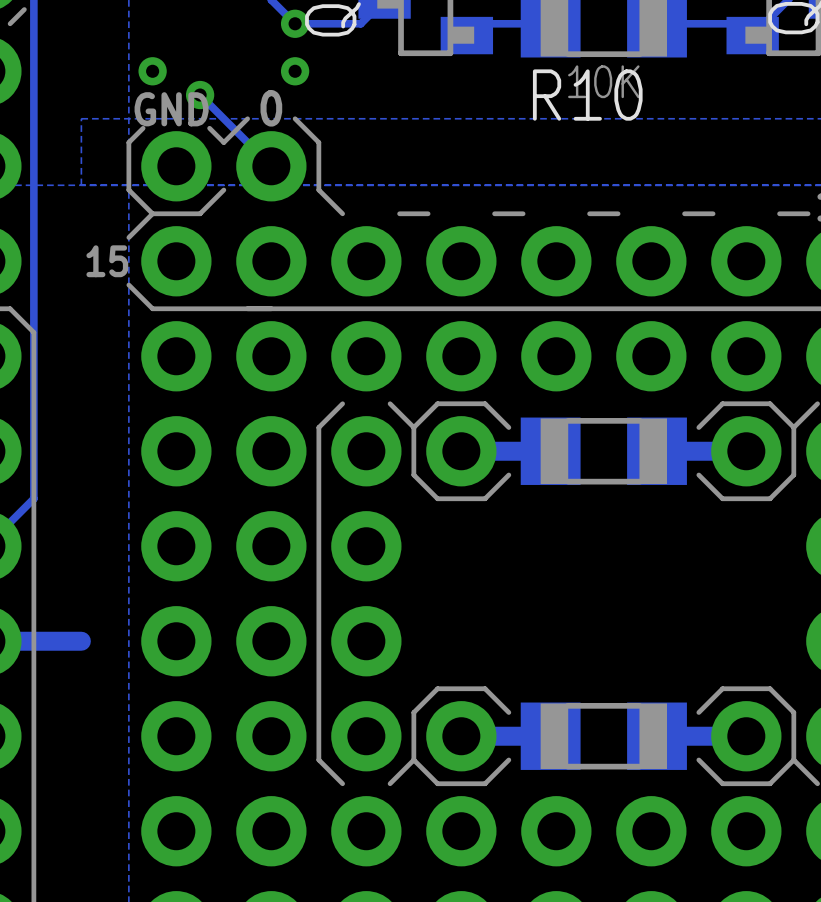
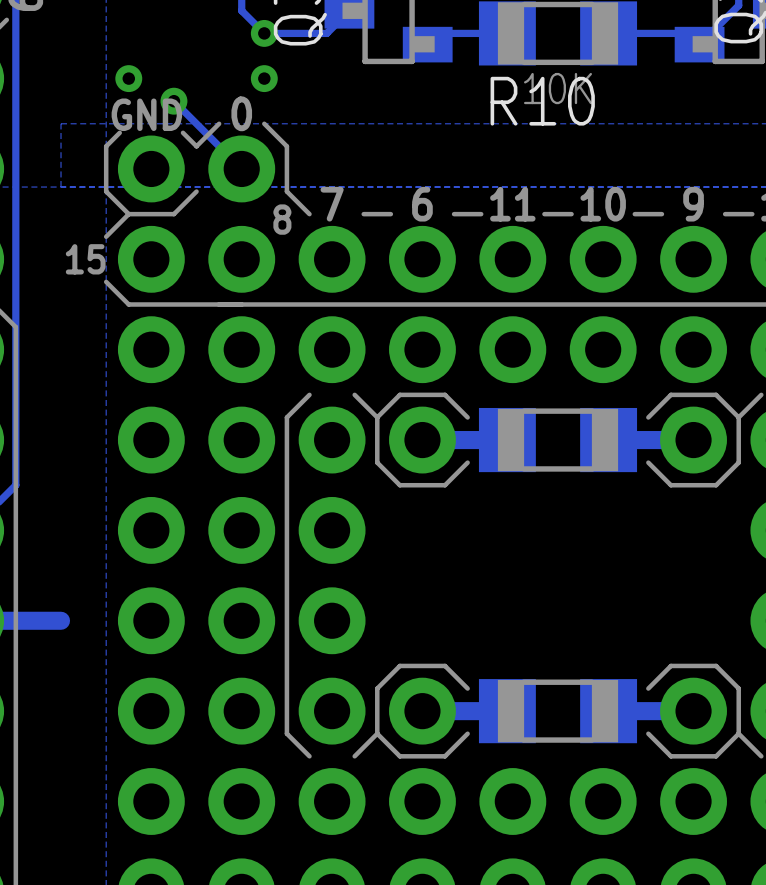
text: none -> 7 (332, 204)
text: none -> 6 (422, 204)
text: none -> 11 (512, 204)
text: none -> 10 (603, 204)
text: none -> 9 (693, 204)
text: none -> 8 (282, 219)

